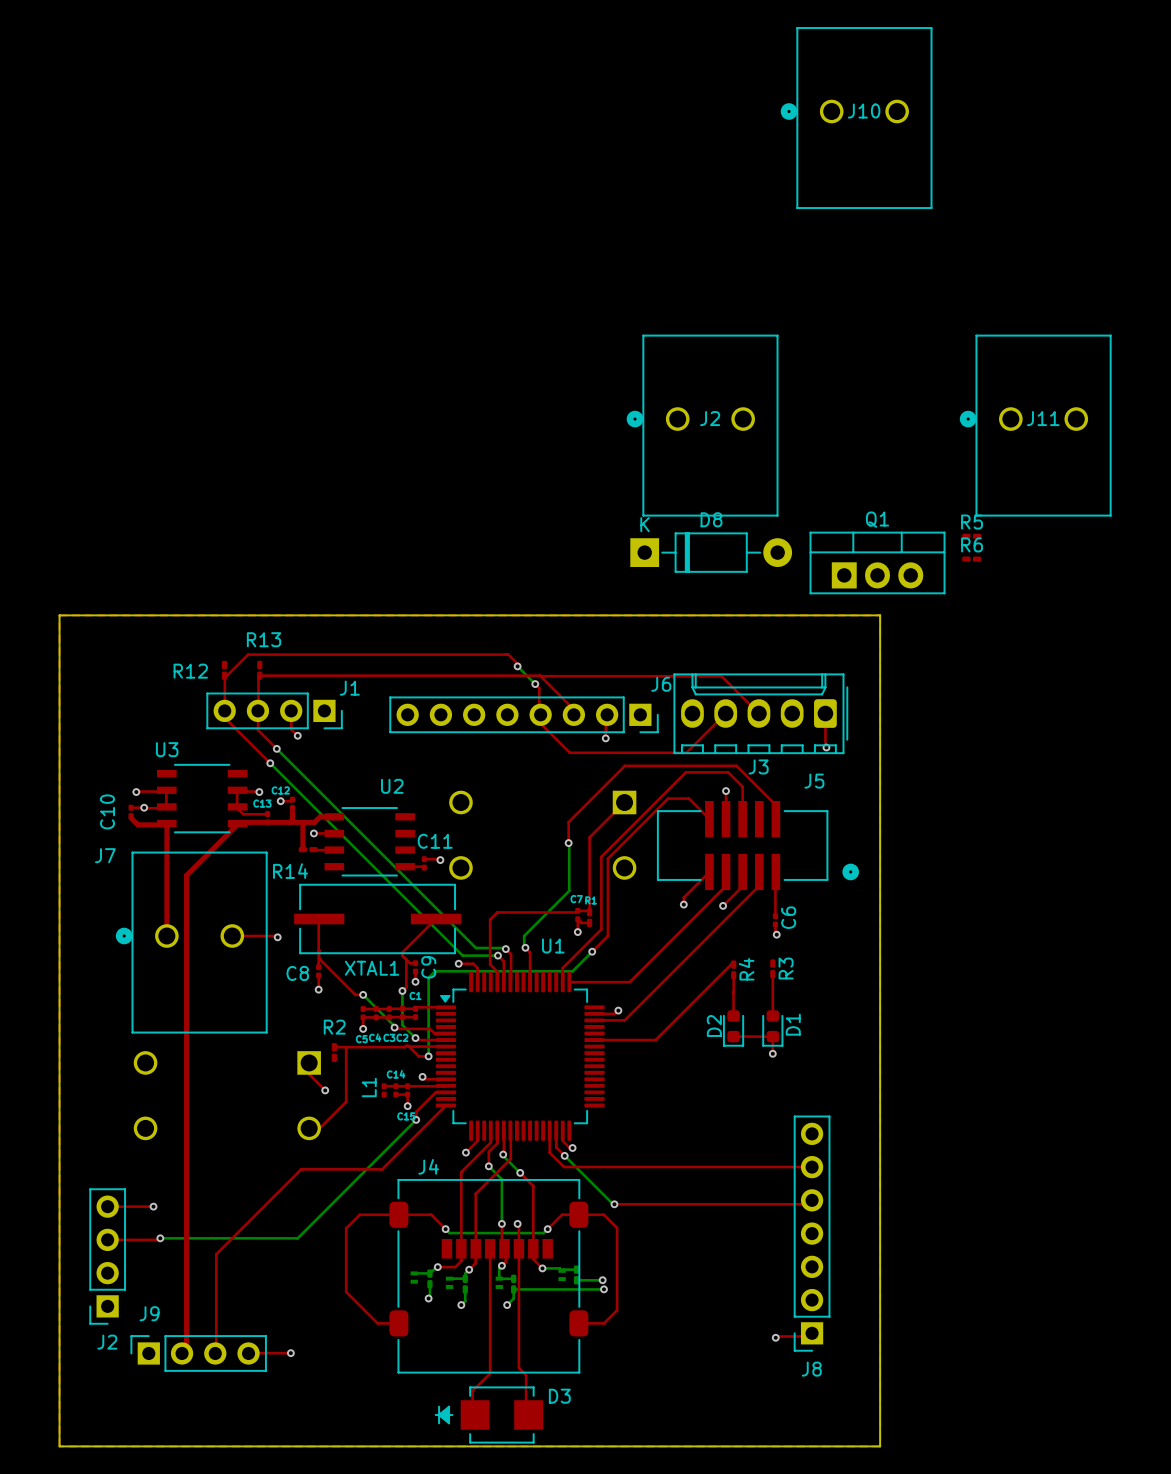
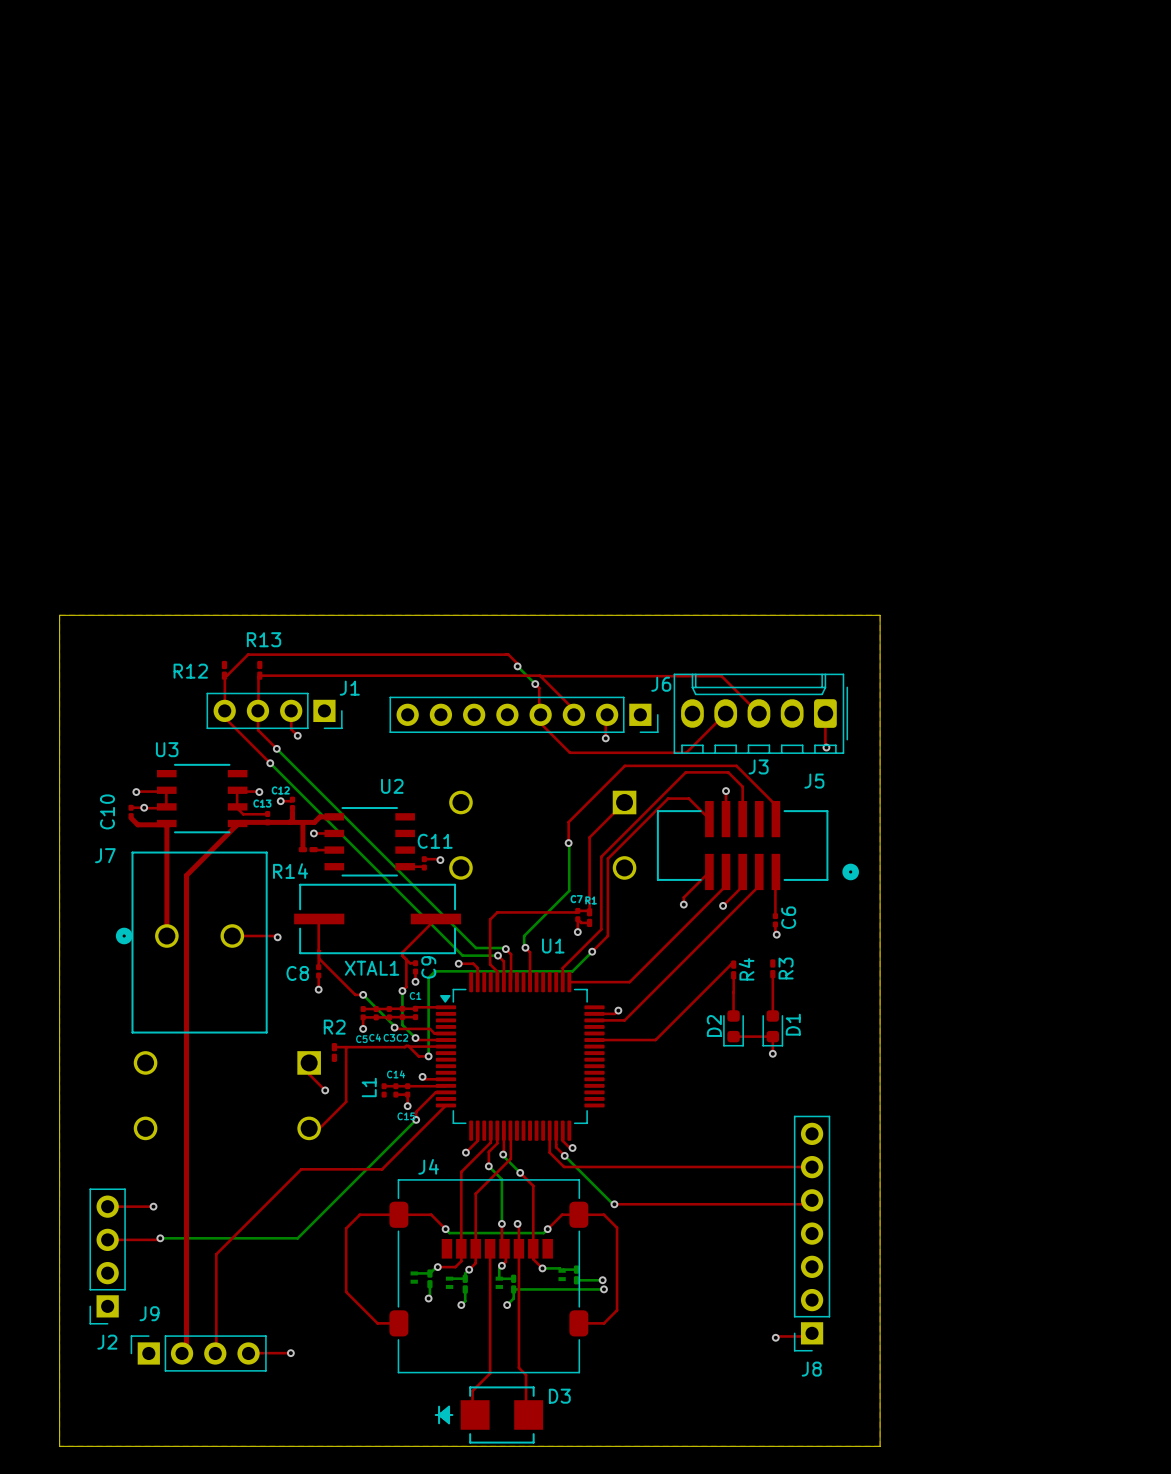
J10: (856, 118) -> none
J2: (702, 425) -> none
J11: (1035, 425) -> none
R5: (971, 536) -> none
D8: (711, 552) -> none
R6: (971, 559) -> none
Q1: (877, 562) -> none

